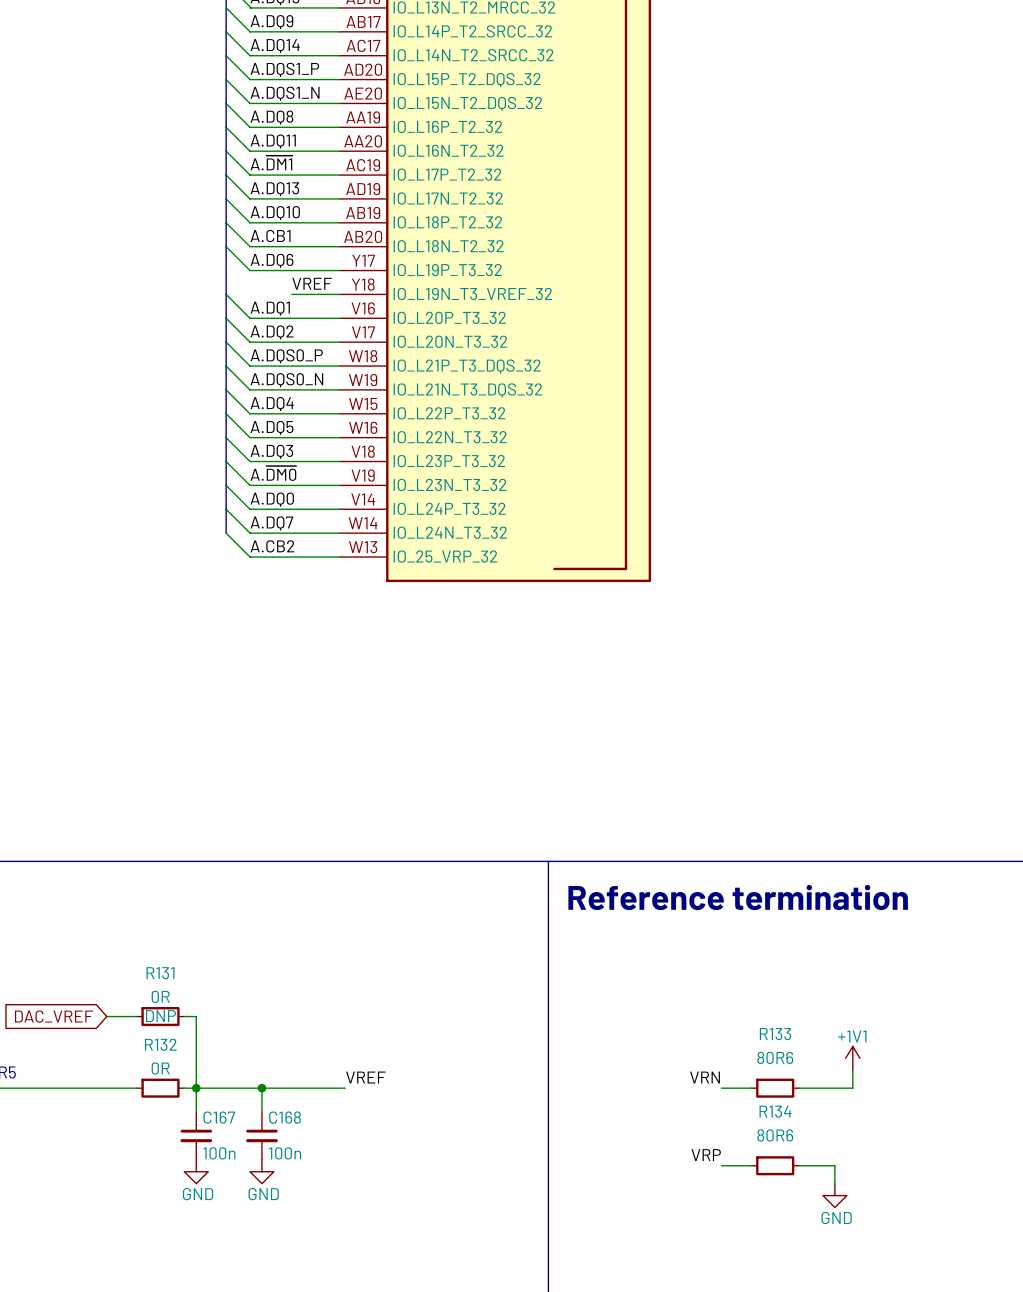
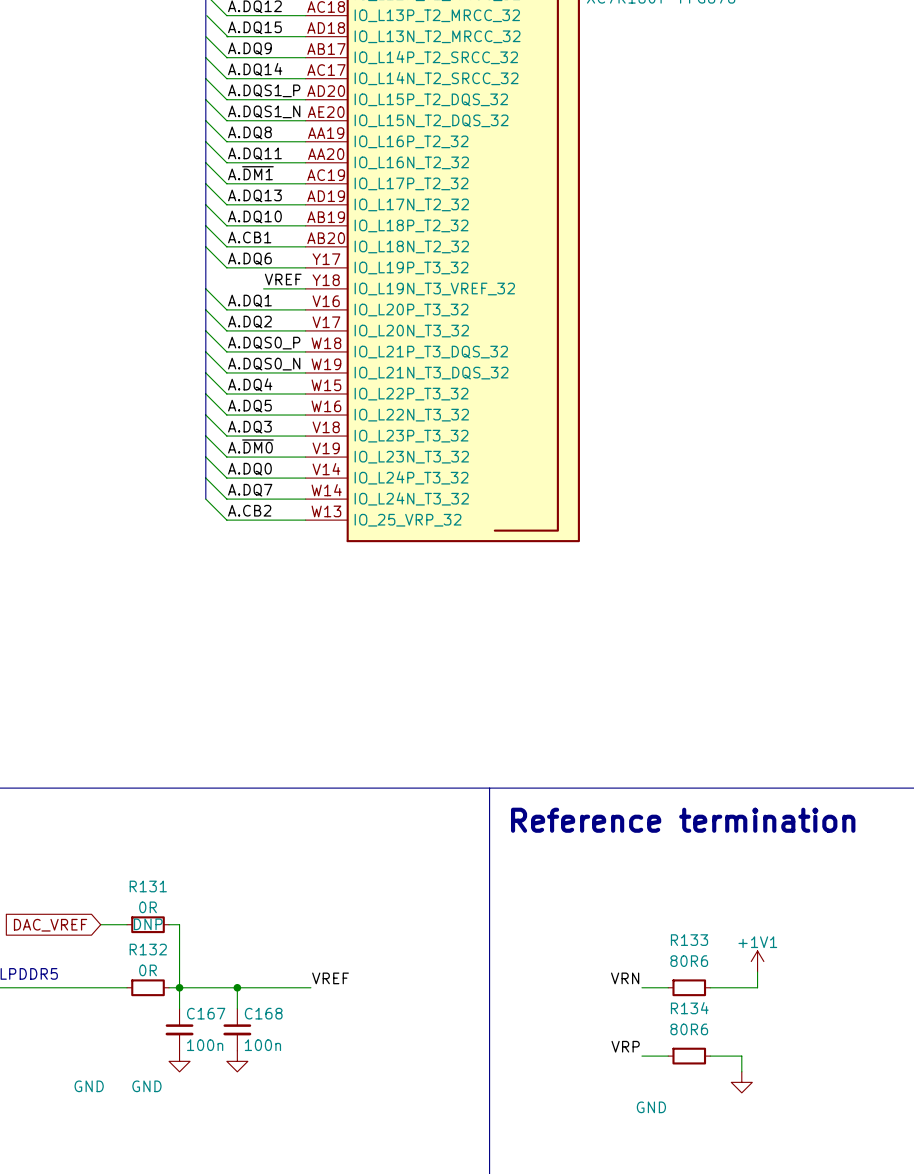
power symbol text position: GND (198, 1194) -> GND (89, 1086)
power symbol text position: GND (263, 1194) -> GND (146, 1086)
power symbol text position: GND (836, 1218) -> GND (651, 1107)

